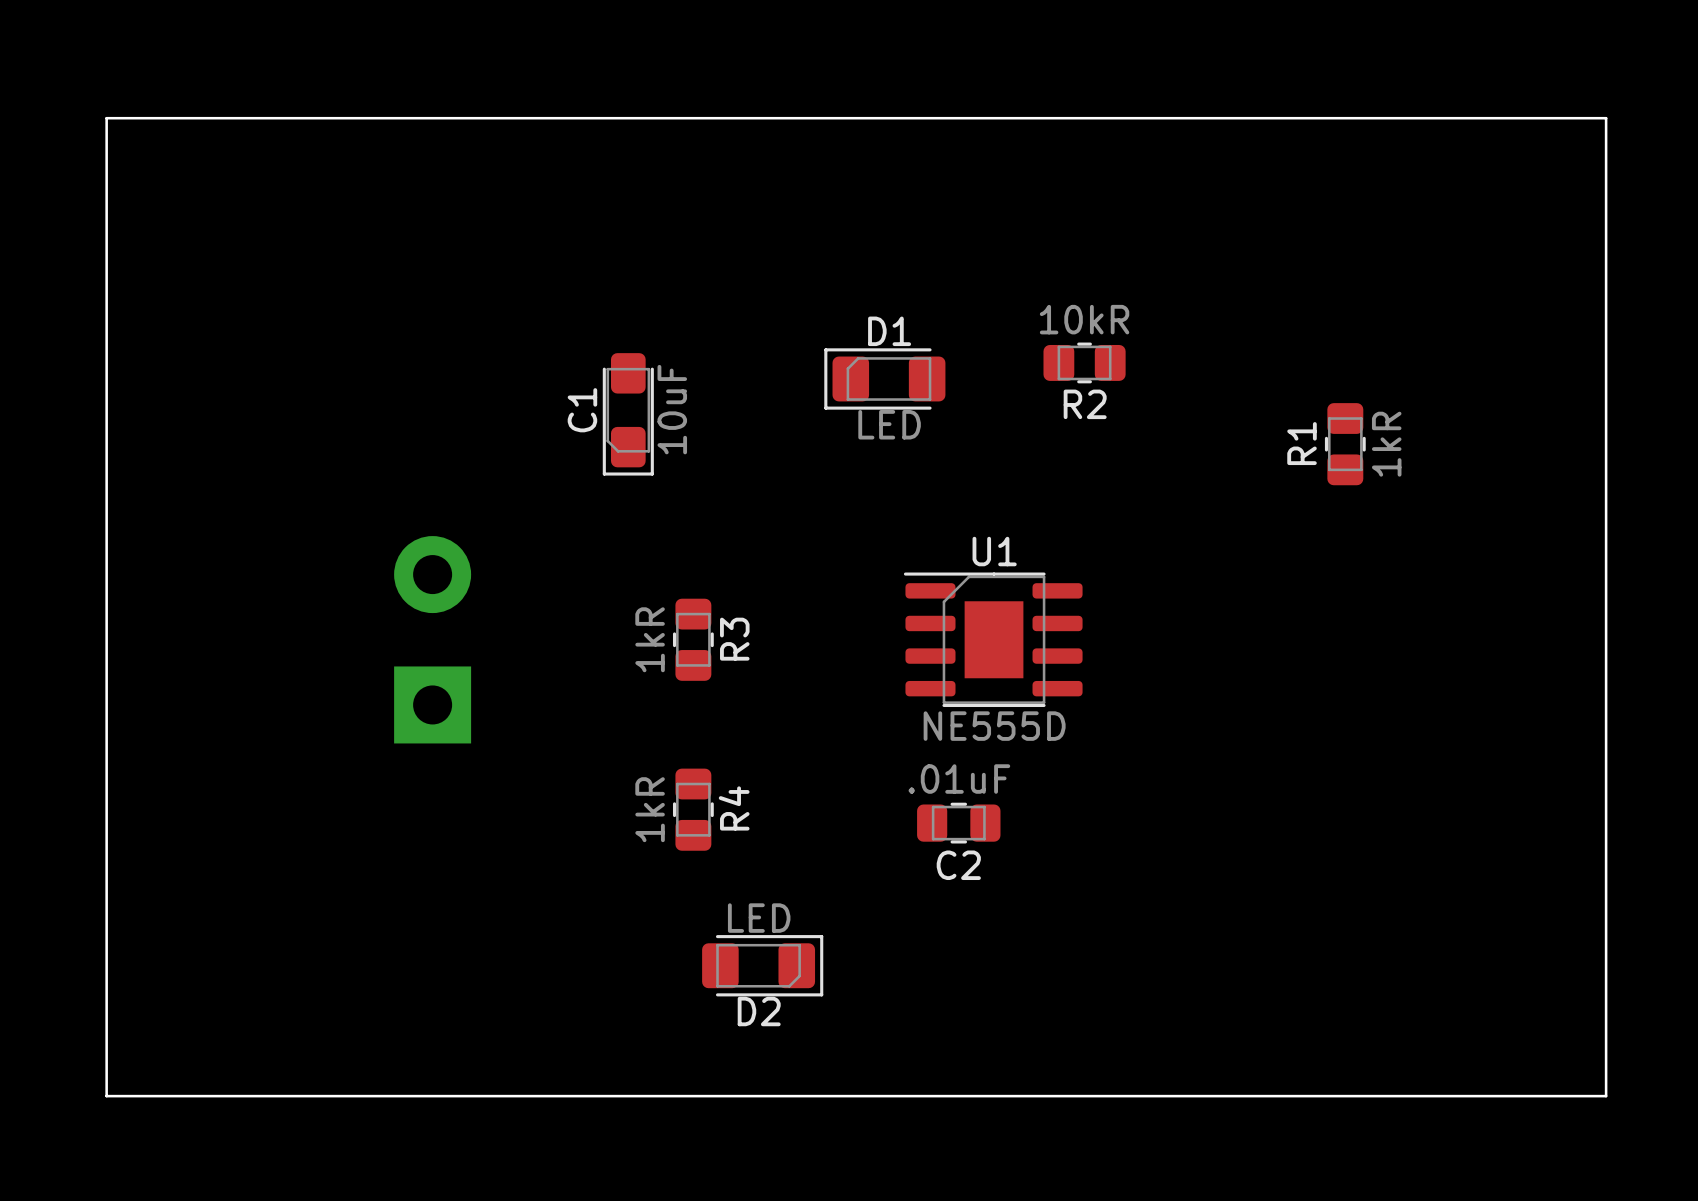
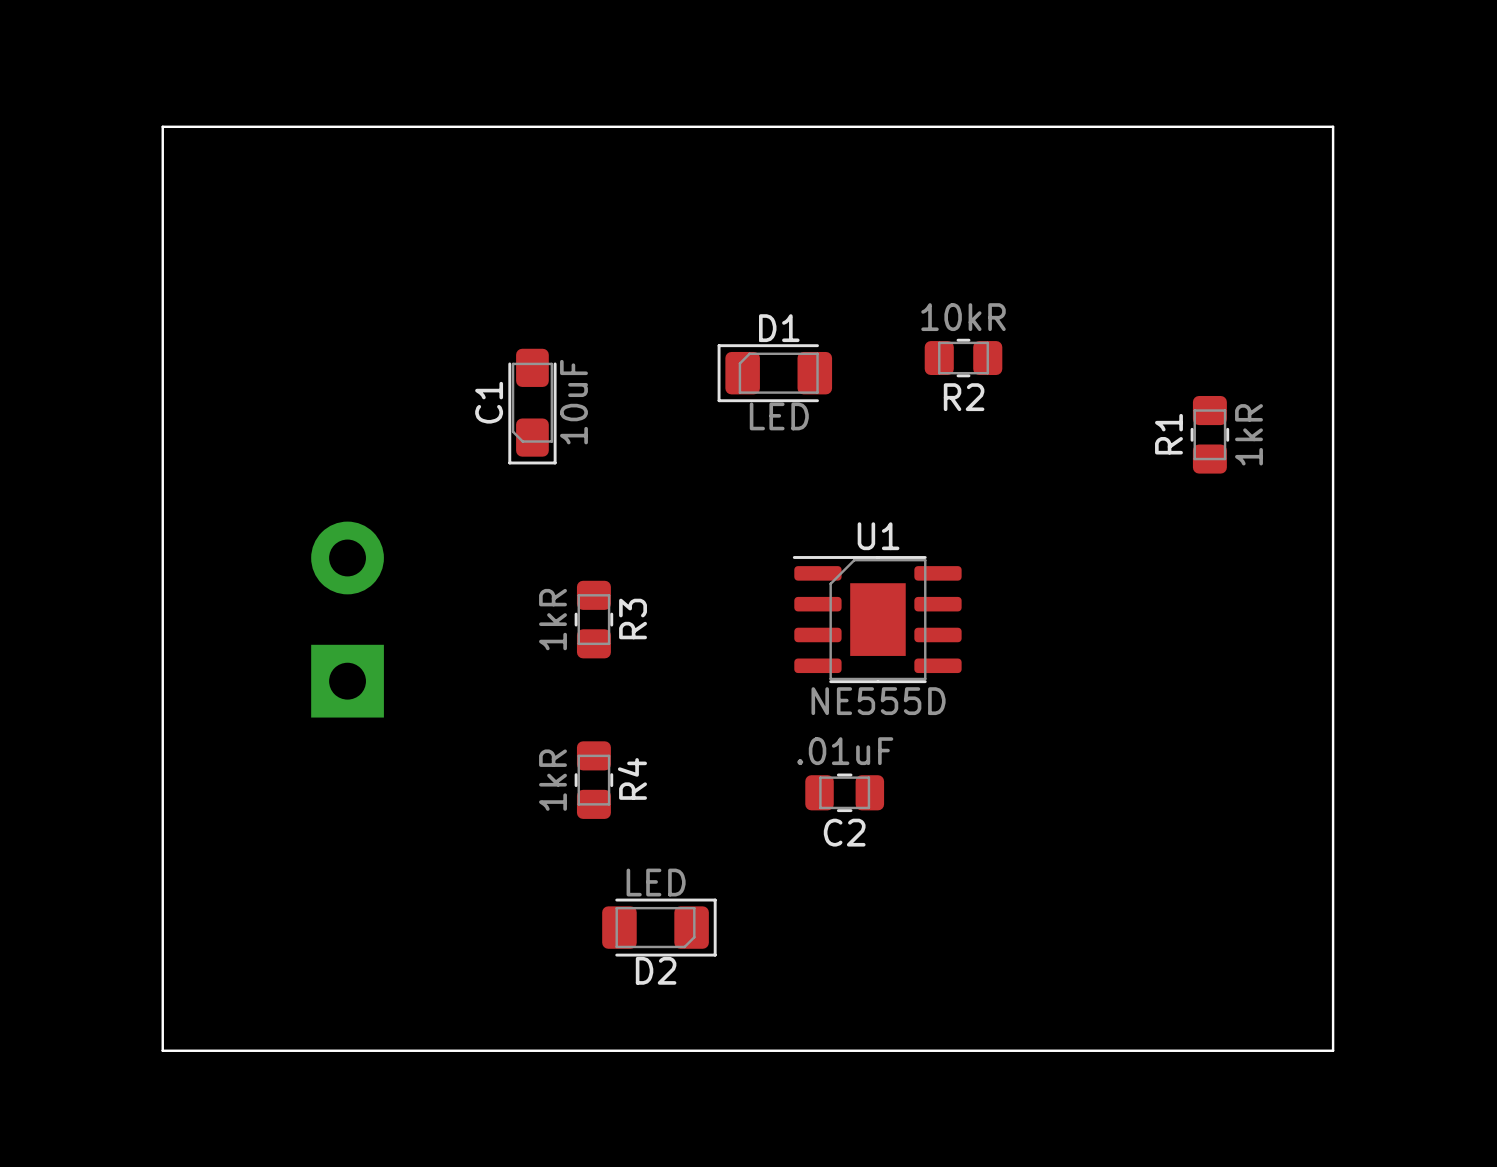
board edge: (237, 118) (106, 118) (106, 1096) (237, 1096) -> (162, 126) (162, 1050)
board edge: (1475, 118) (1606, 118) (1606, 1096) (1475, 1096) -> (1333, 126) (1333, 1050)

